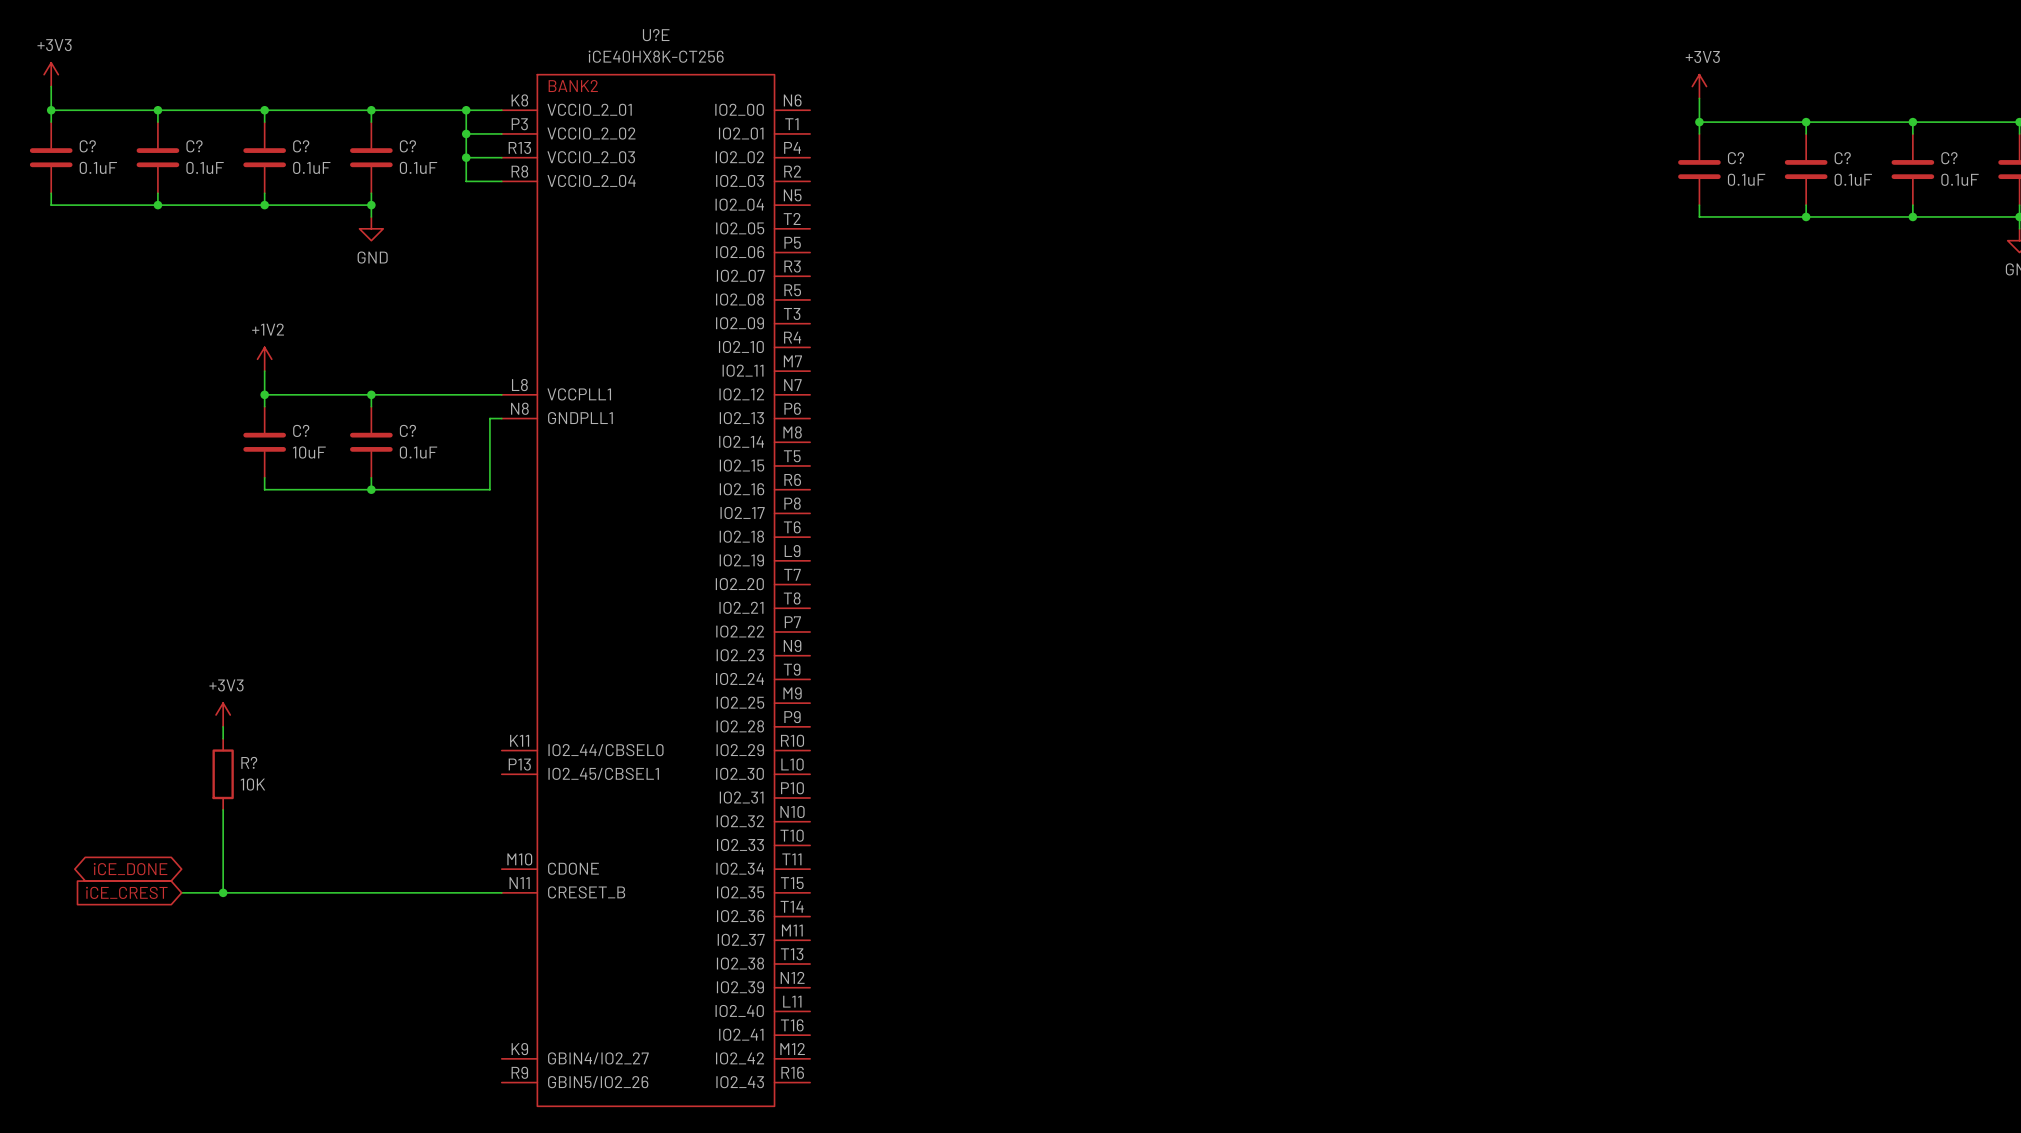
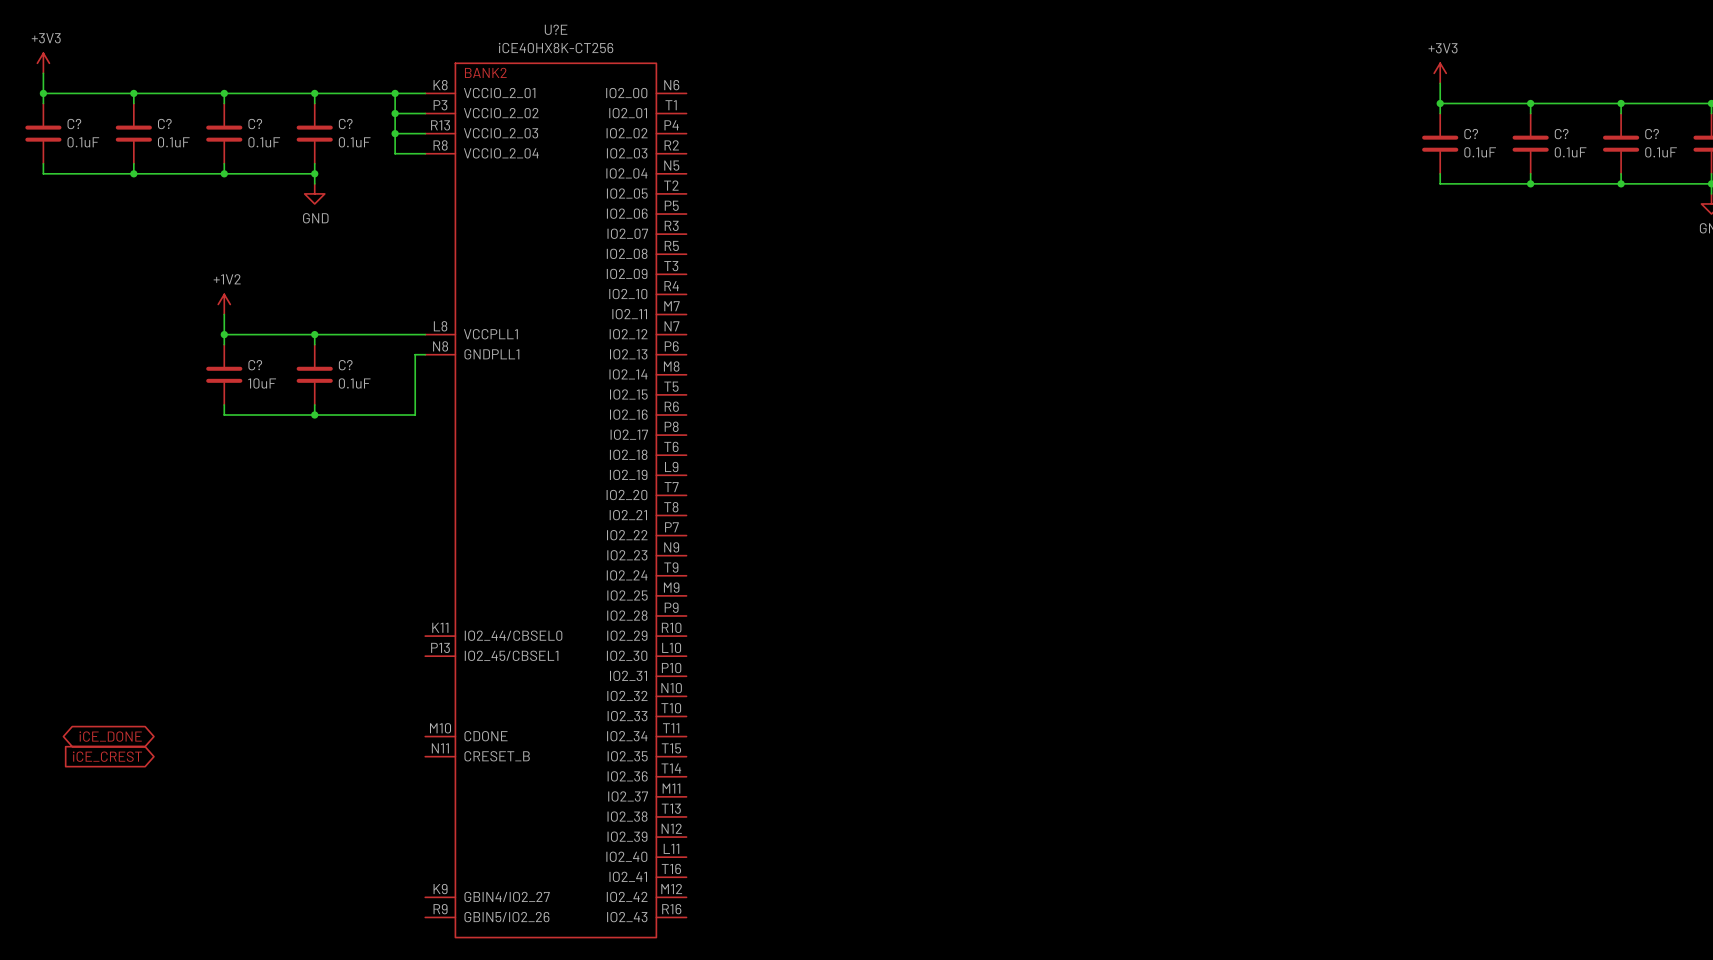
power symbol: +3V3 (223, 714) -> none
wire: (223, 726) (223, 738) -> none
R?: (223, 774) -> none
wire: (223, 809) (223, 892) -> none
wire: (181, 892) (501, 892) -> none
junction: (223, 892) -> none

